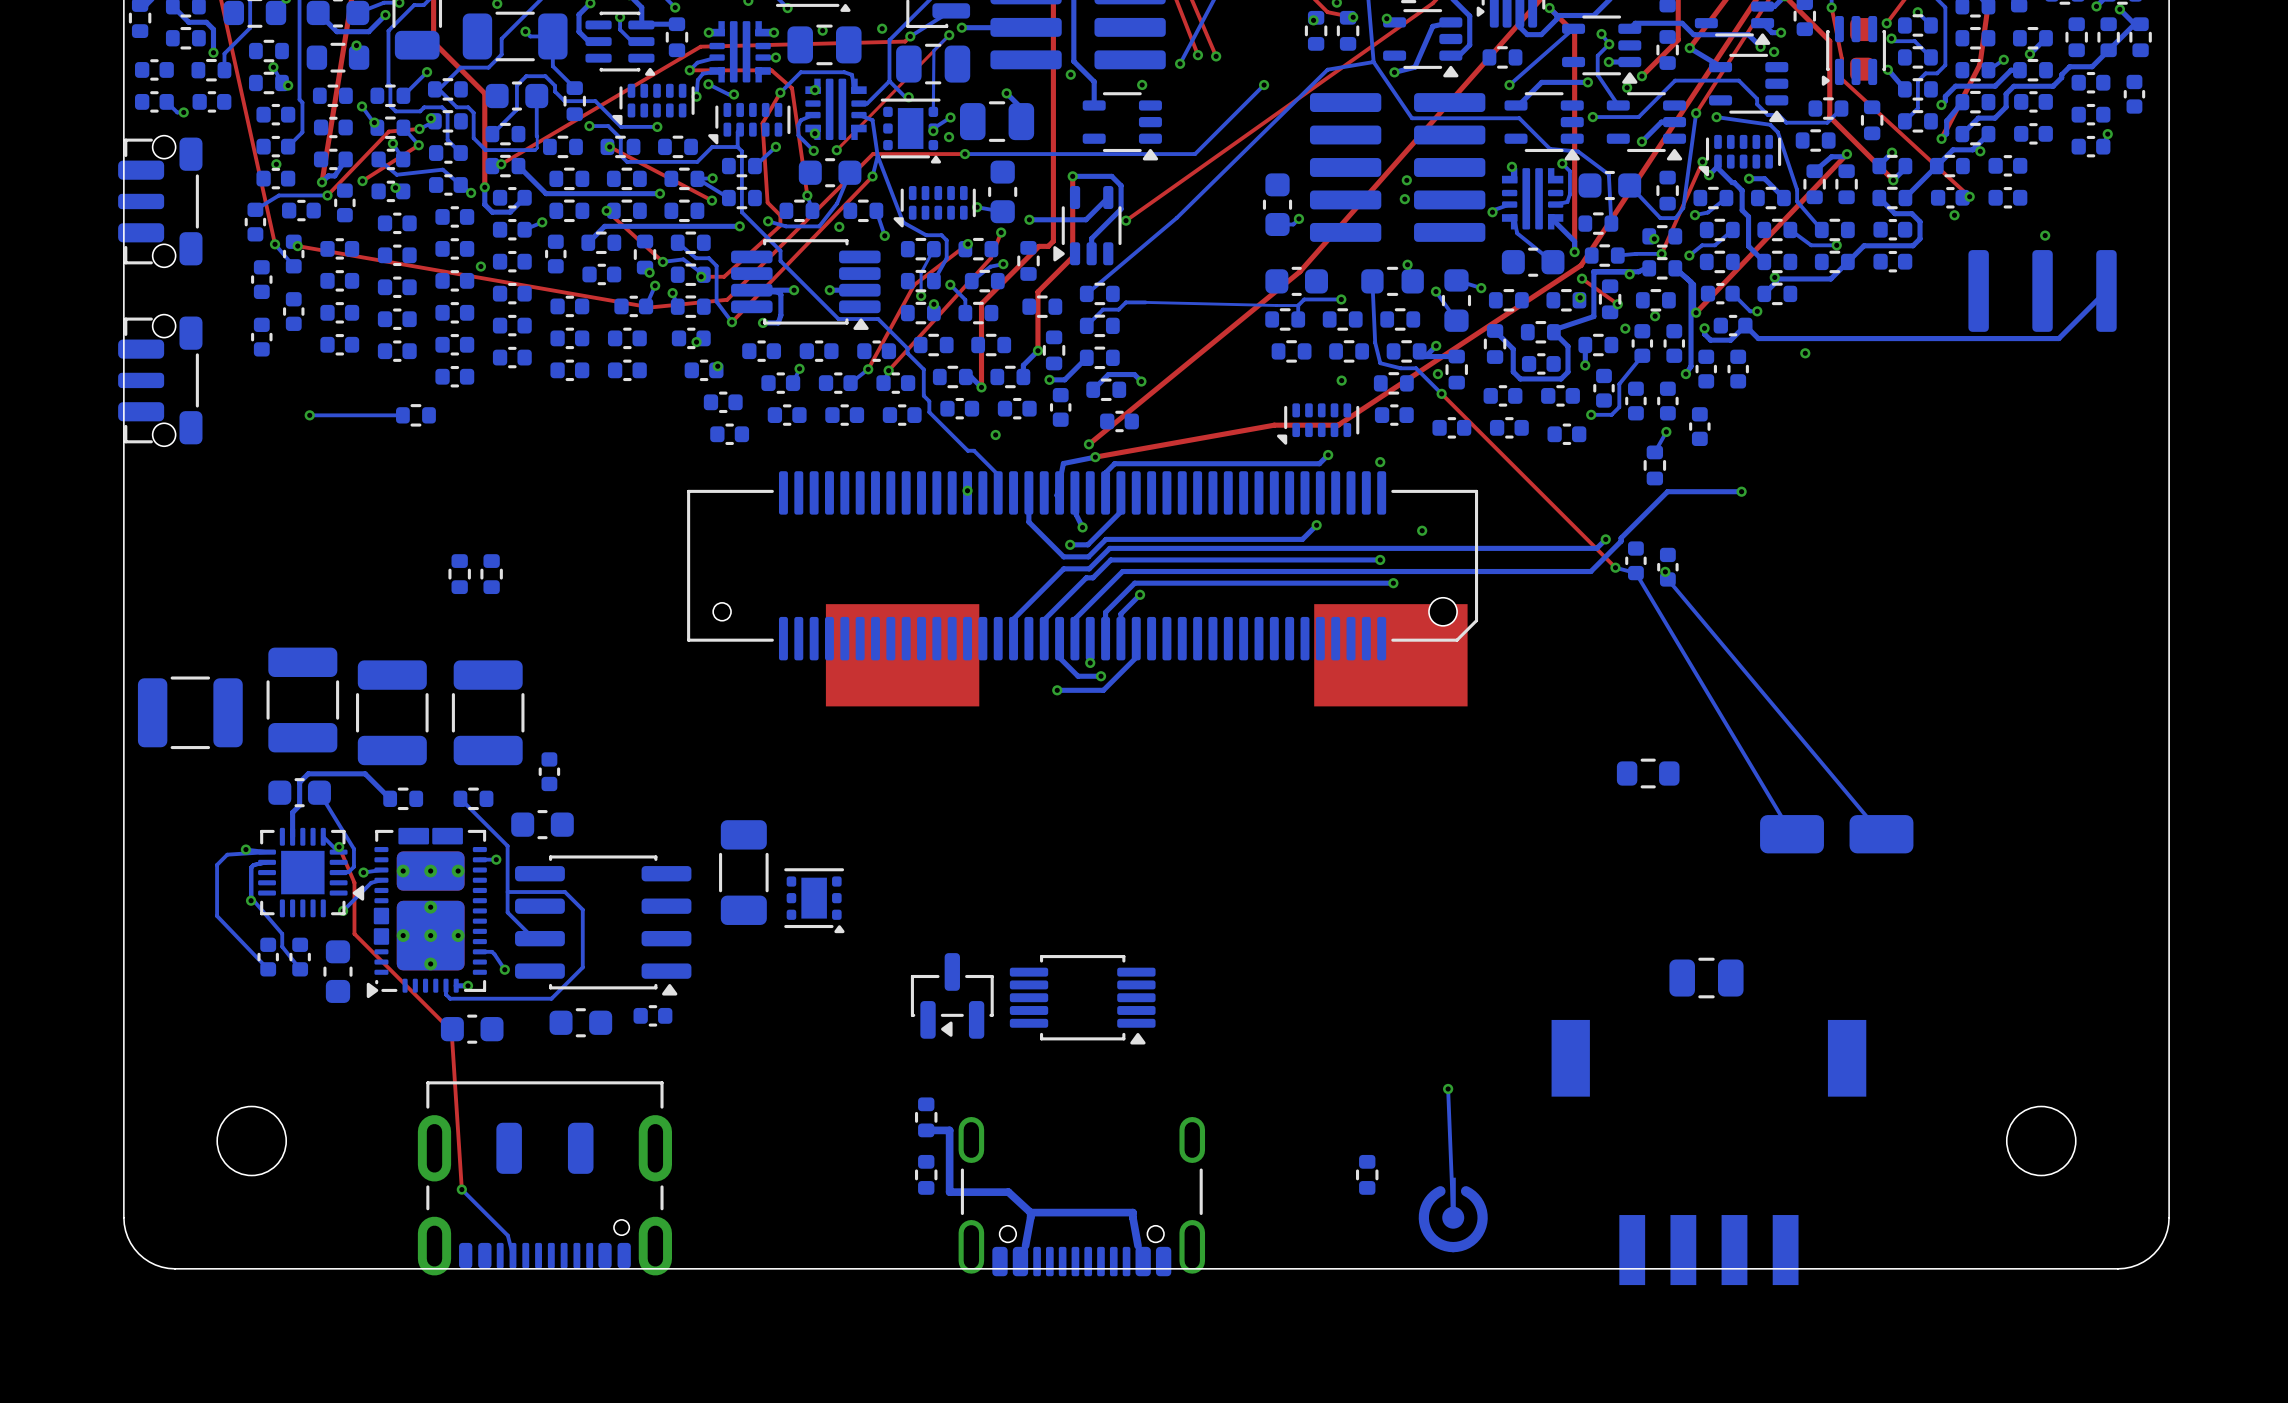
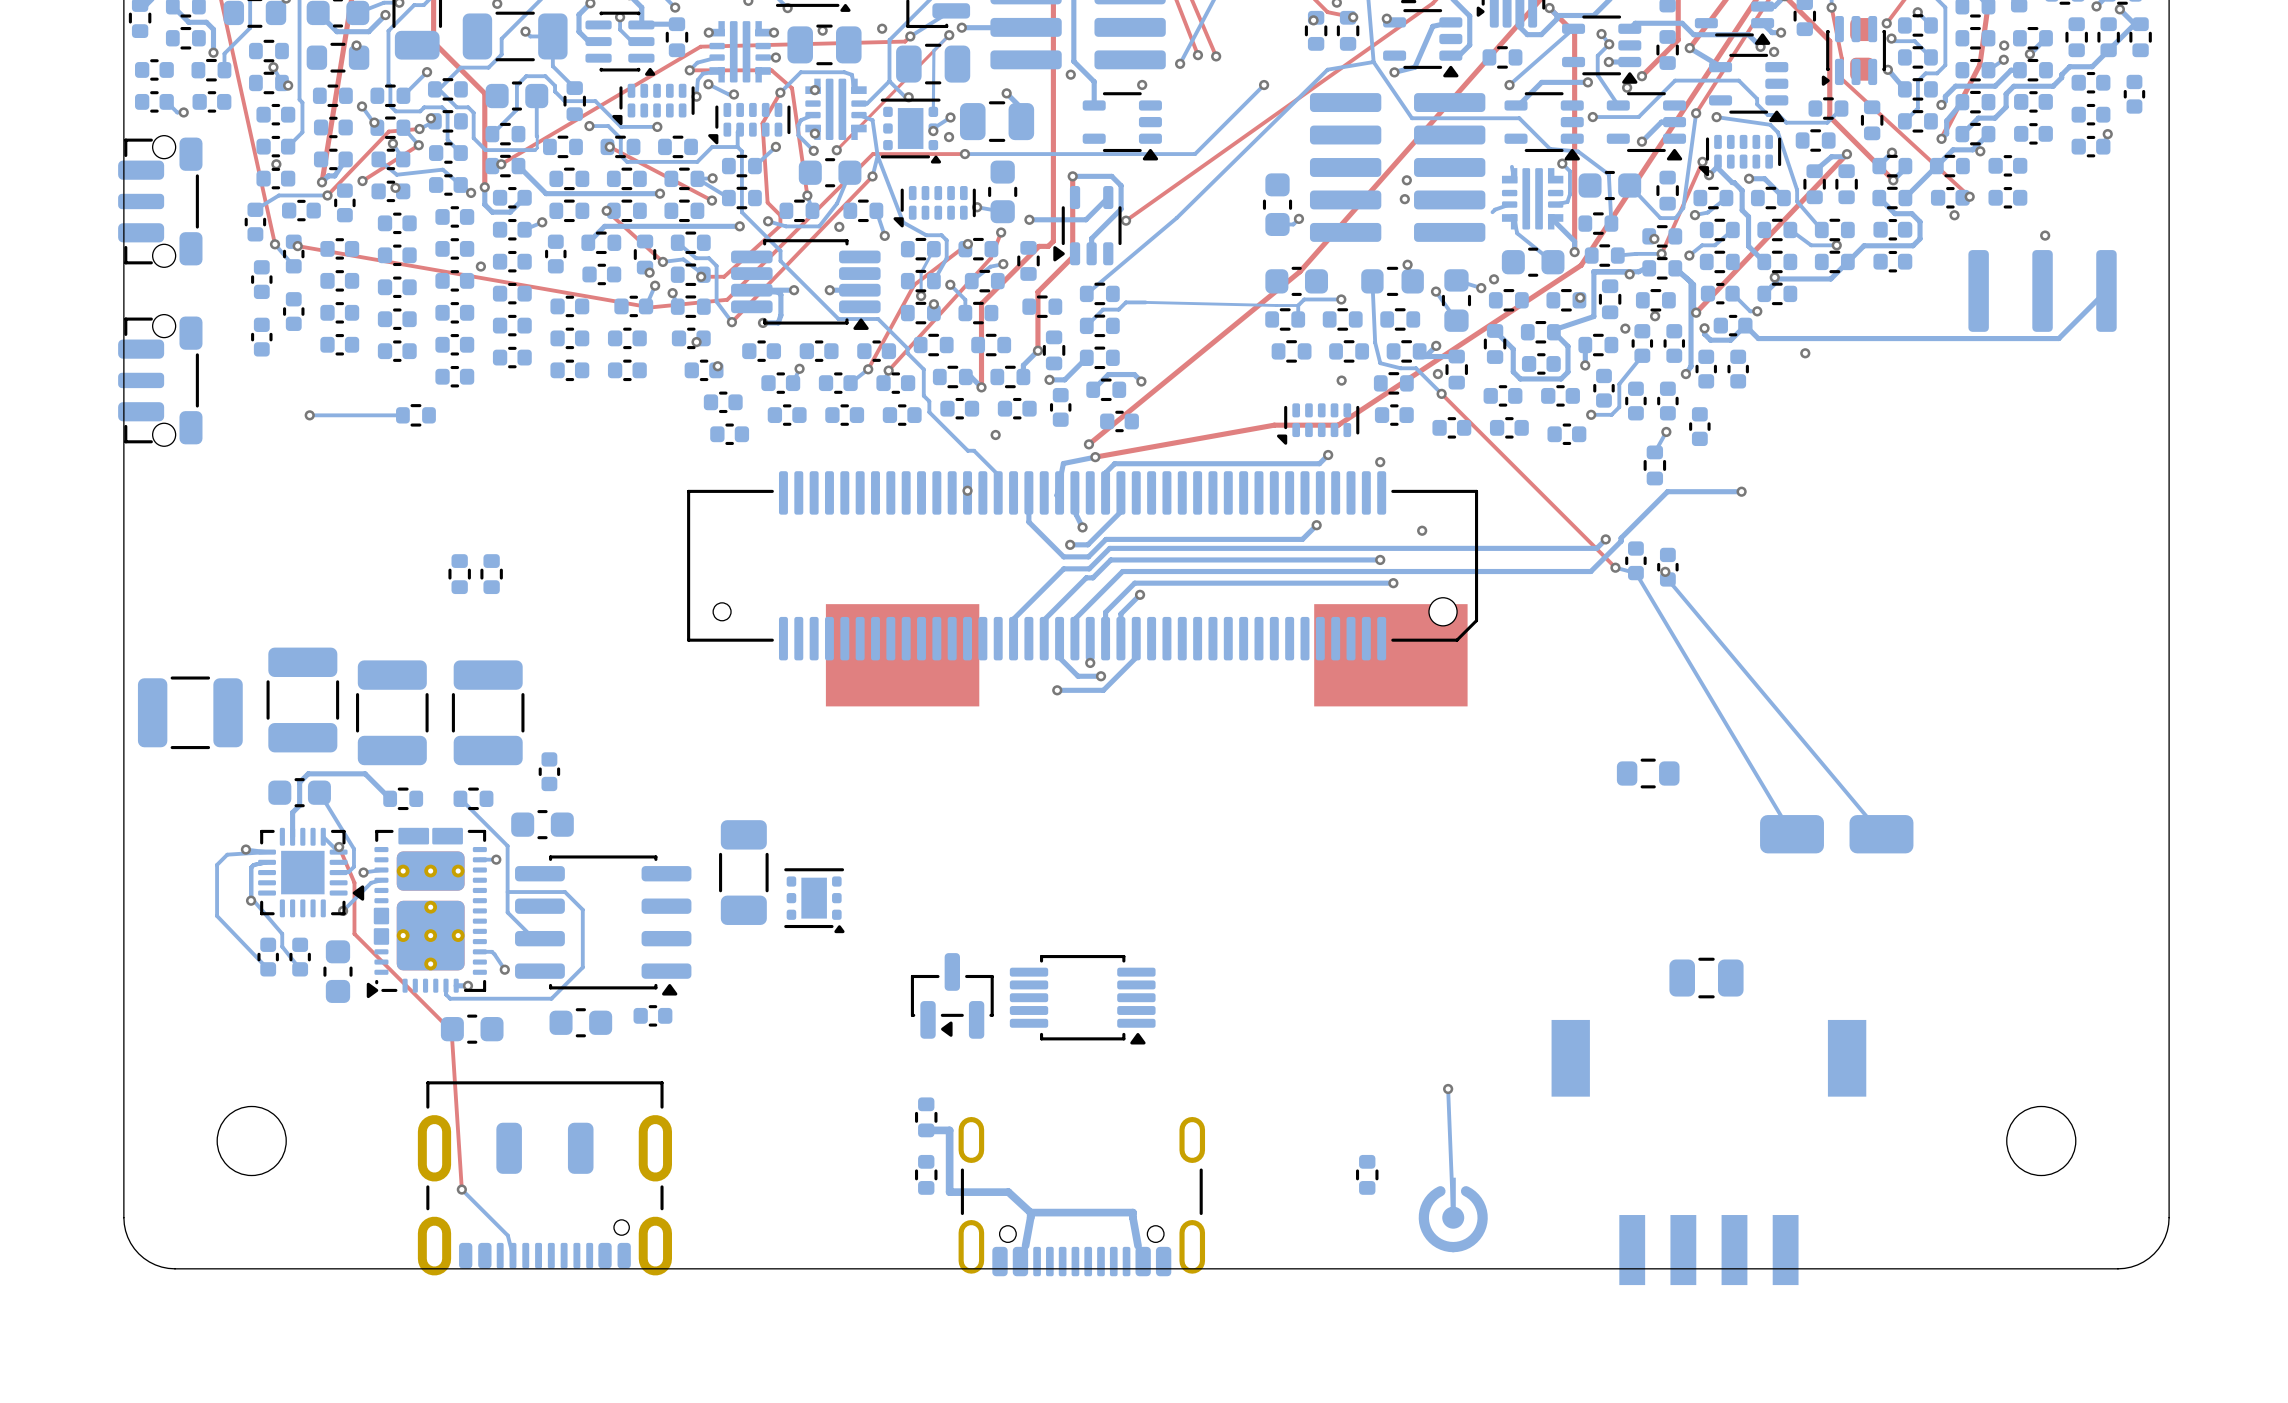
via: none -> (2004, 45)
via: (1511, 166) -> none
via: (1492, 212) -> none
top track: (1581, 278) (1617, 304) -> none
via: (1581, 278) -> none
via: none -> (1494, 279)
via: (1617, 304) -> none

